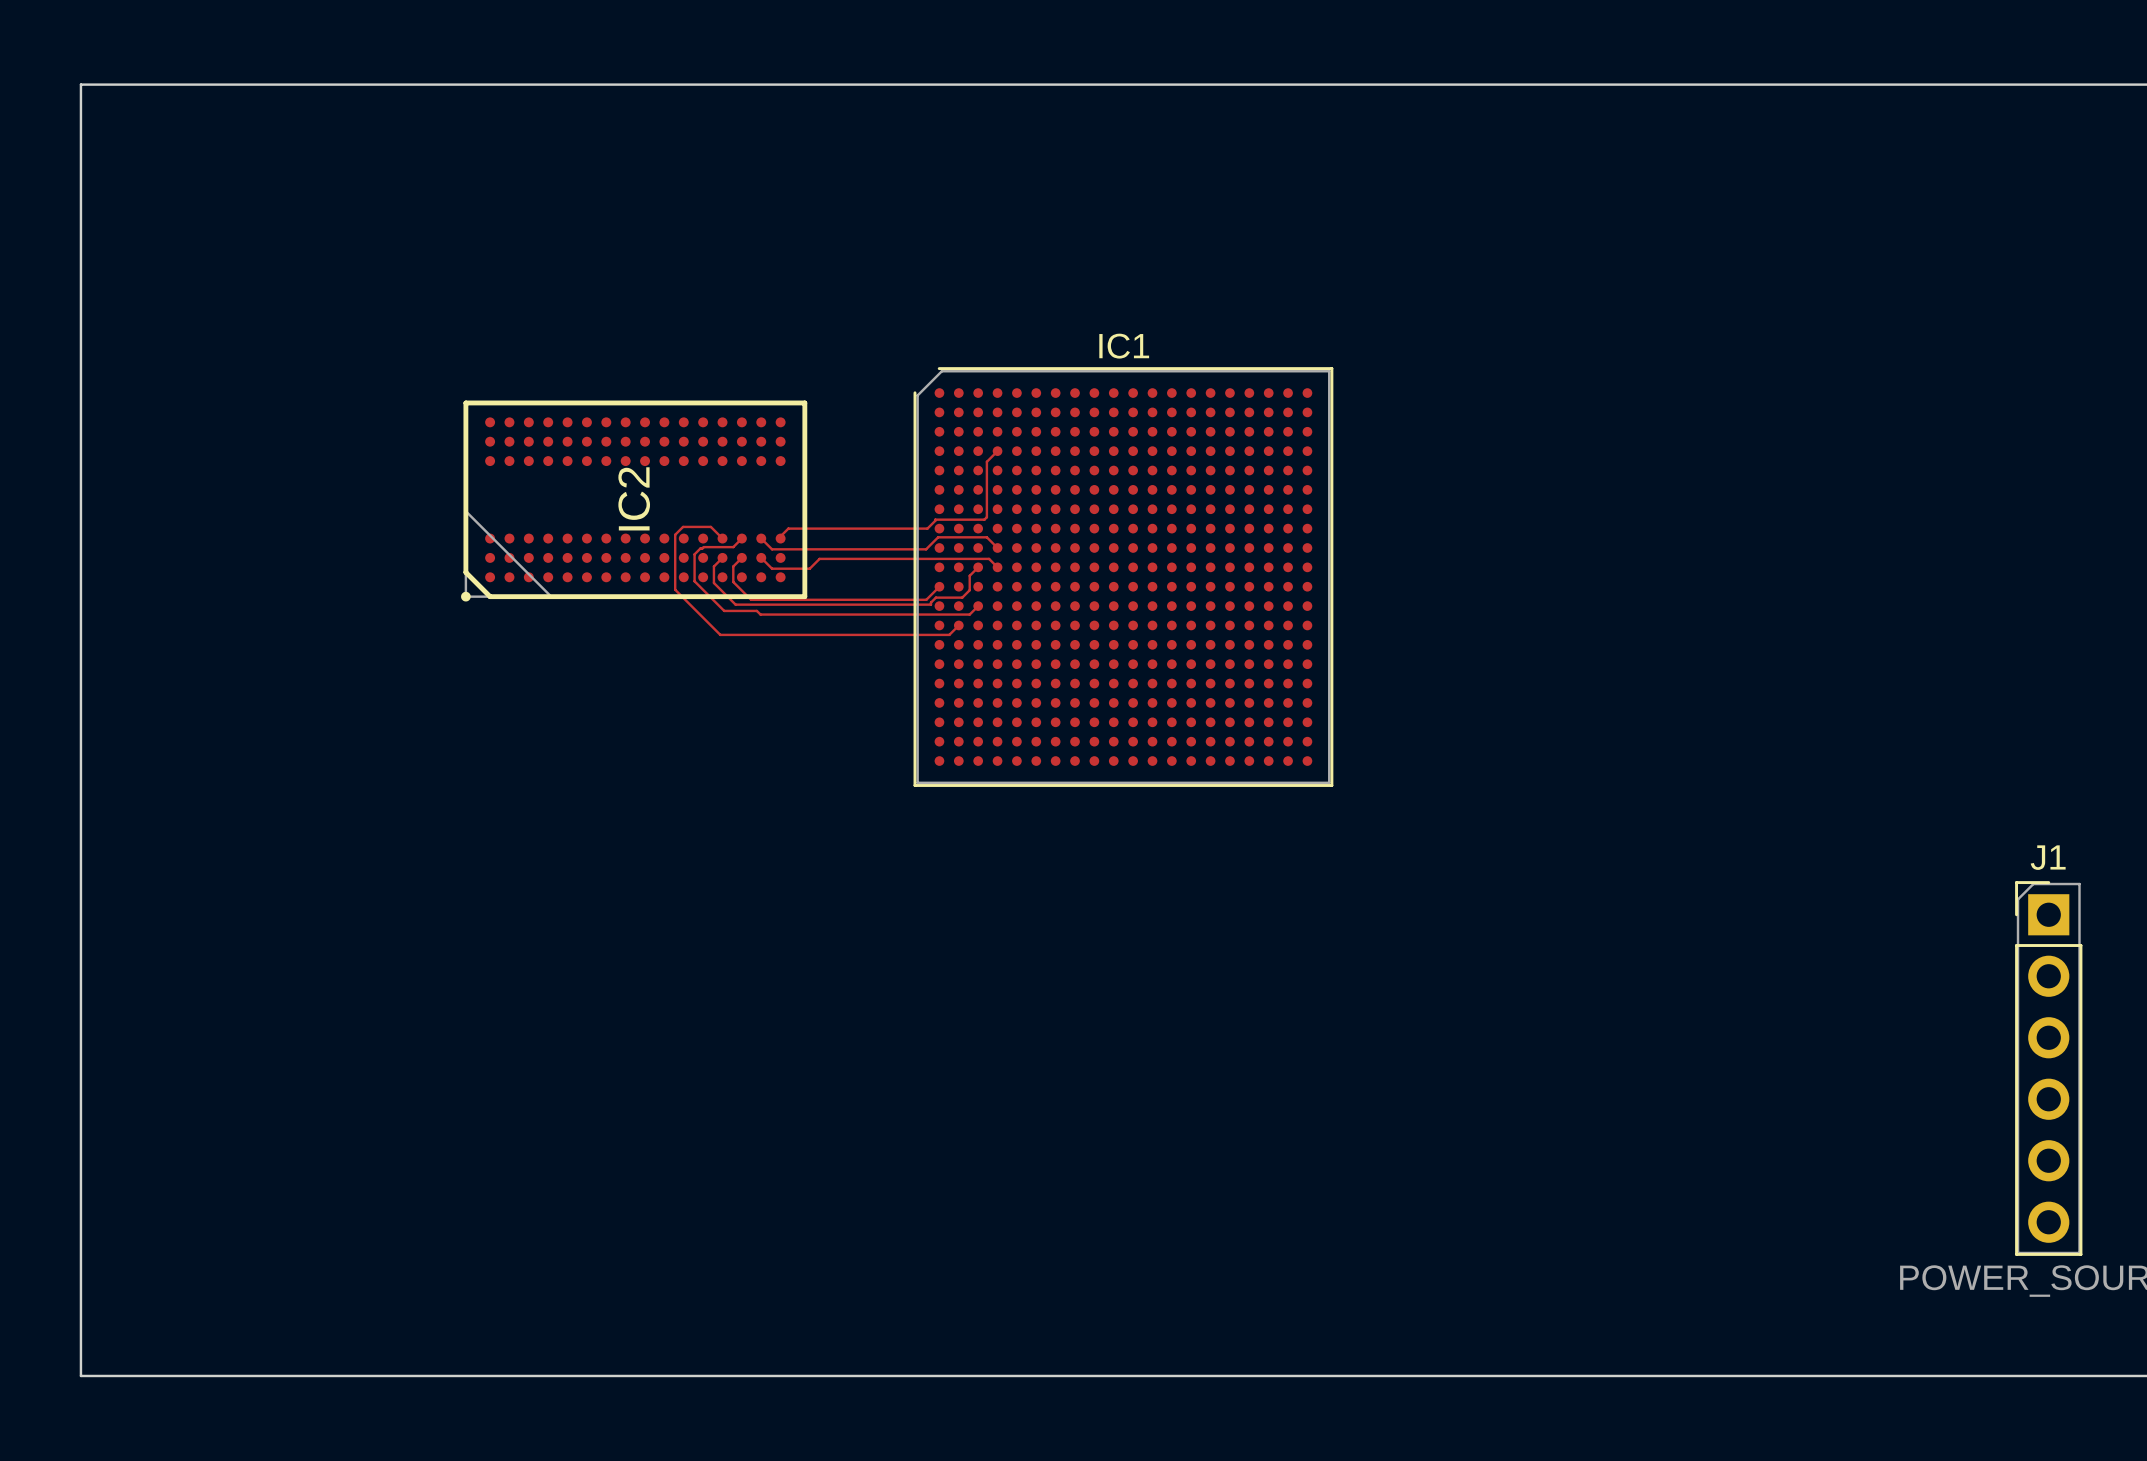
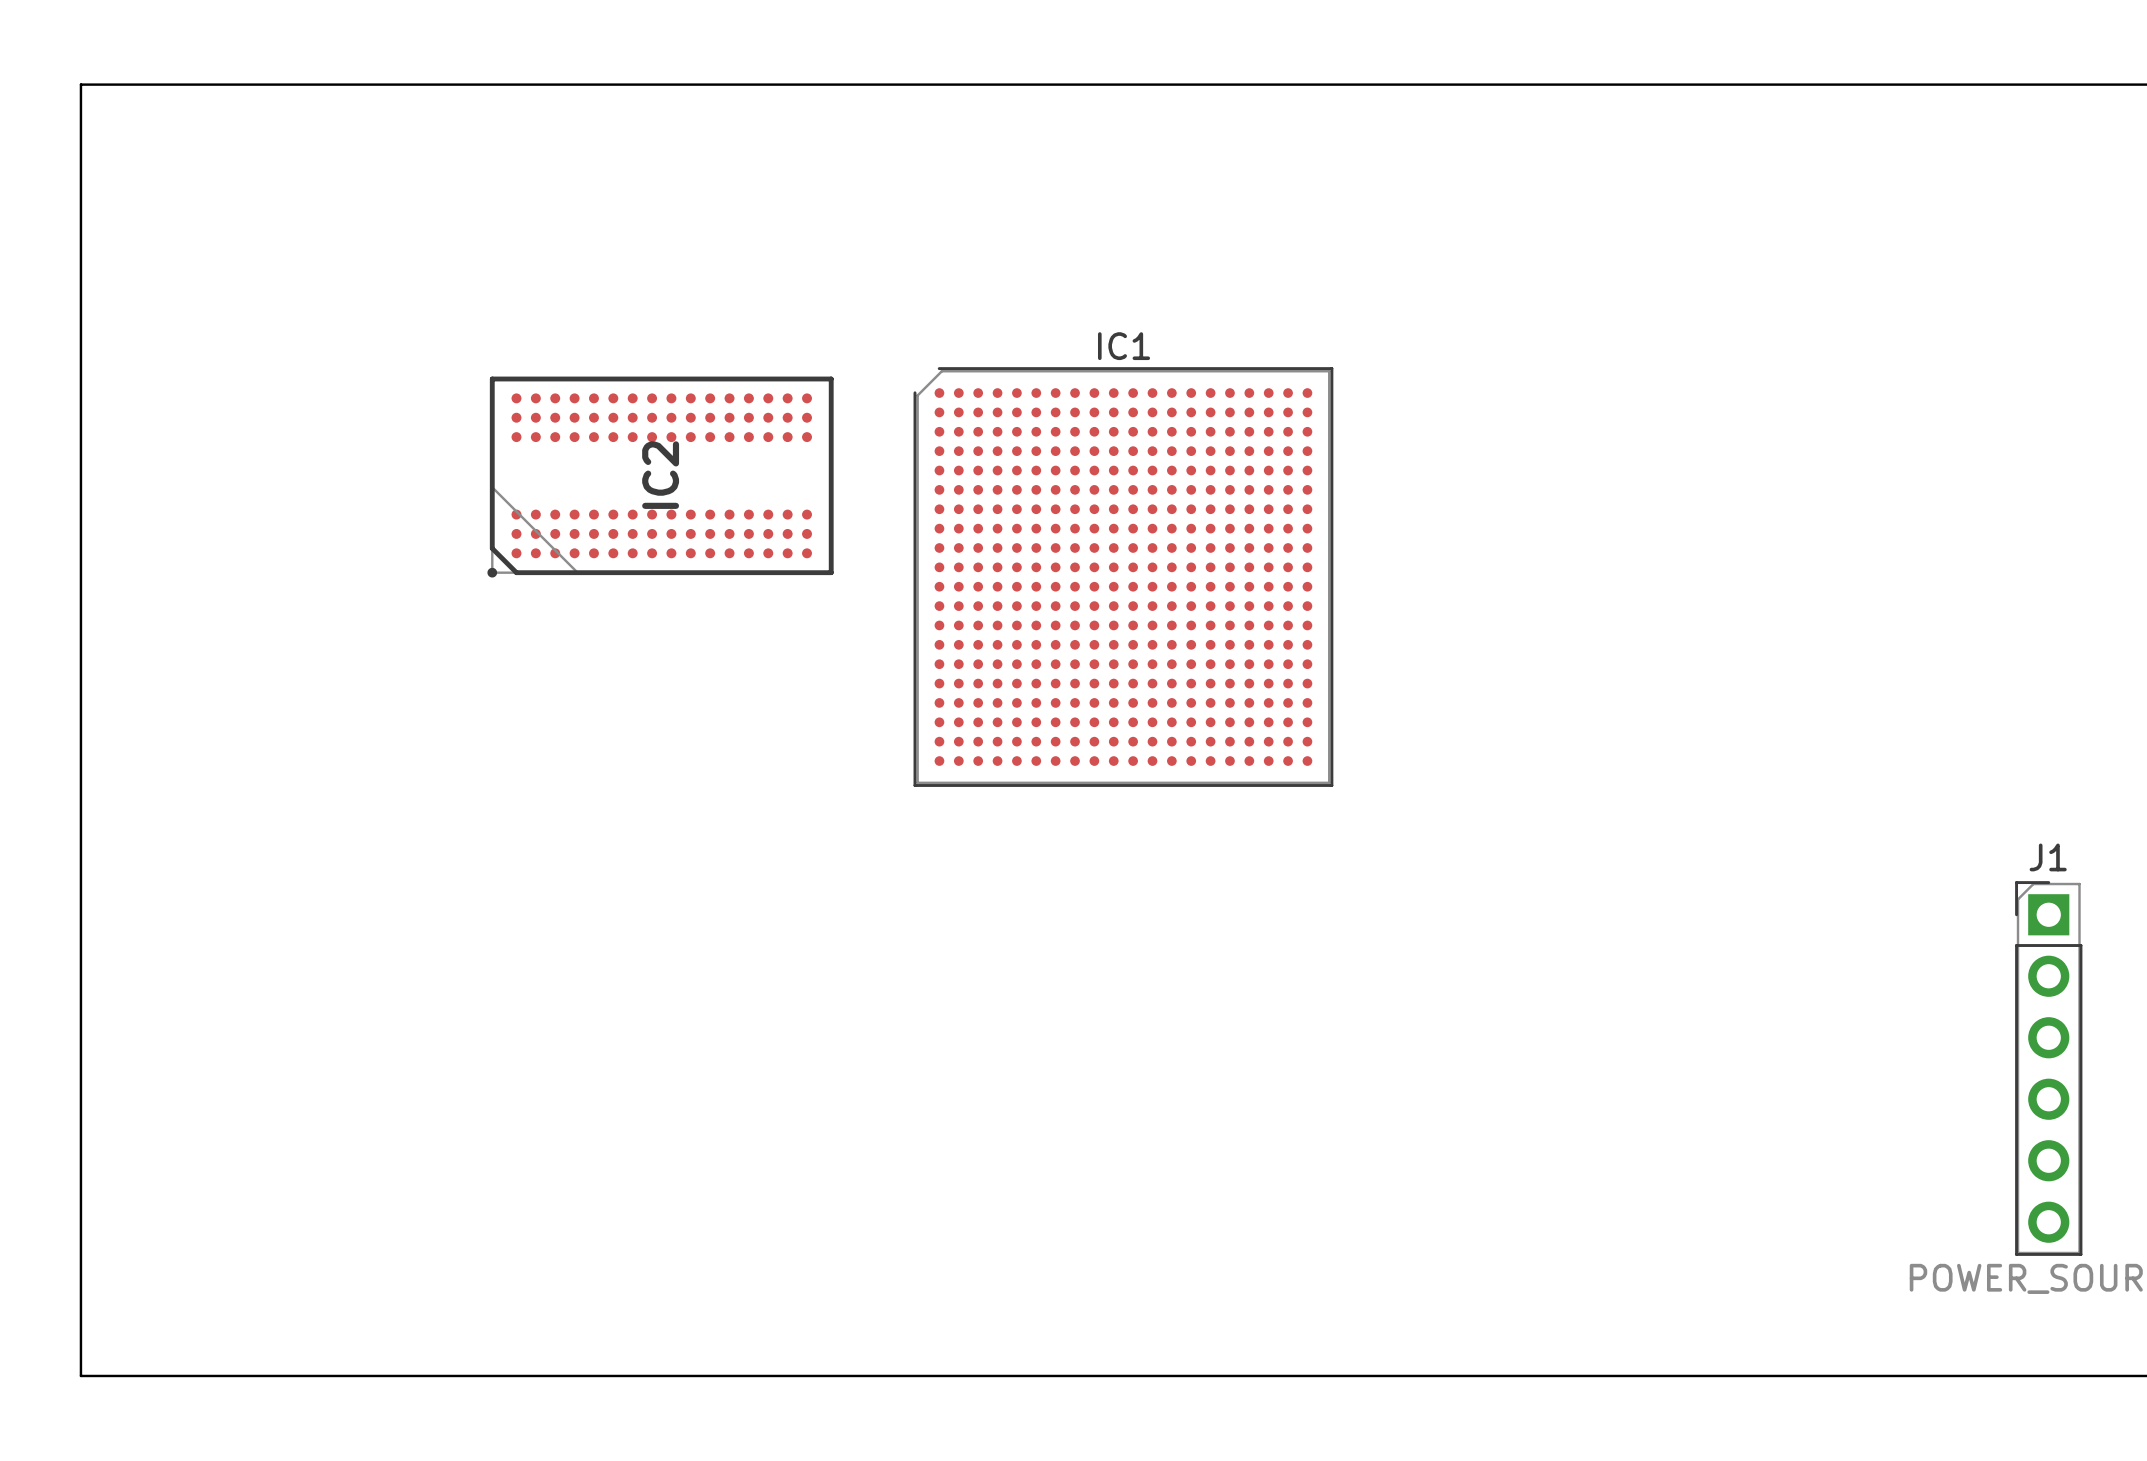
top track: (997, 451) (986, 461) (986, 517) (984, 519) (935, 519) (927, 528) (788, 528) (780, 538) -> none
IC2 position: (634, 501) -> (660, 477)
top track: (722, 538) (710, 526) (683, 526) (675, 534) (675, 589) (720, 634) (949, 634) (958, 625) -> none
top track: (741, 538) (733, 547) (703, 547) (694, 554) (694, 581) (724, 610) (756, 610) (760, 614) (969, 614) (978, 606) -> none
top track: (761, 538) (772, 549) (926, 549) (938, 537) (986, 537) (997, 547) -> none
top track: (722, 557) (713, 566) (713, 582) (735, 604) (930, 604) (935, 597) (962, 597) (969, 590) (969, 575) (978, 567) -> none
top track: (741, 557) (733, 566) (733, 582) (751, 599) (926, 599) (939, 586) -> none
top track: (761, 557) (772, 568) (809, 568) (819, 558) (989, 558) (997, 567) -> none

